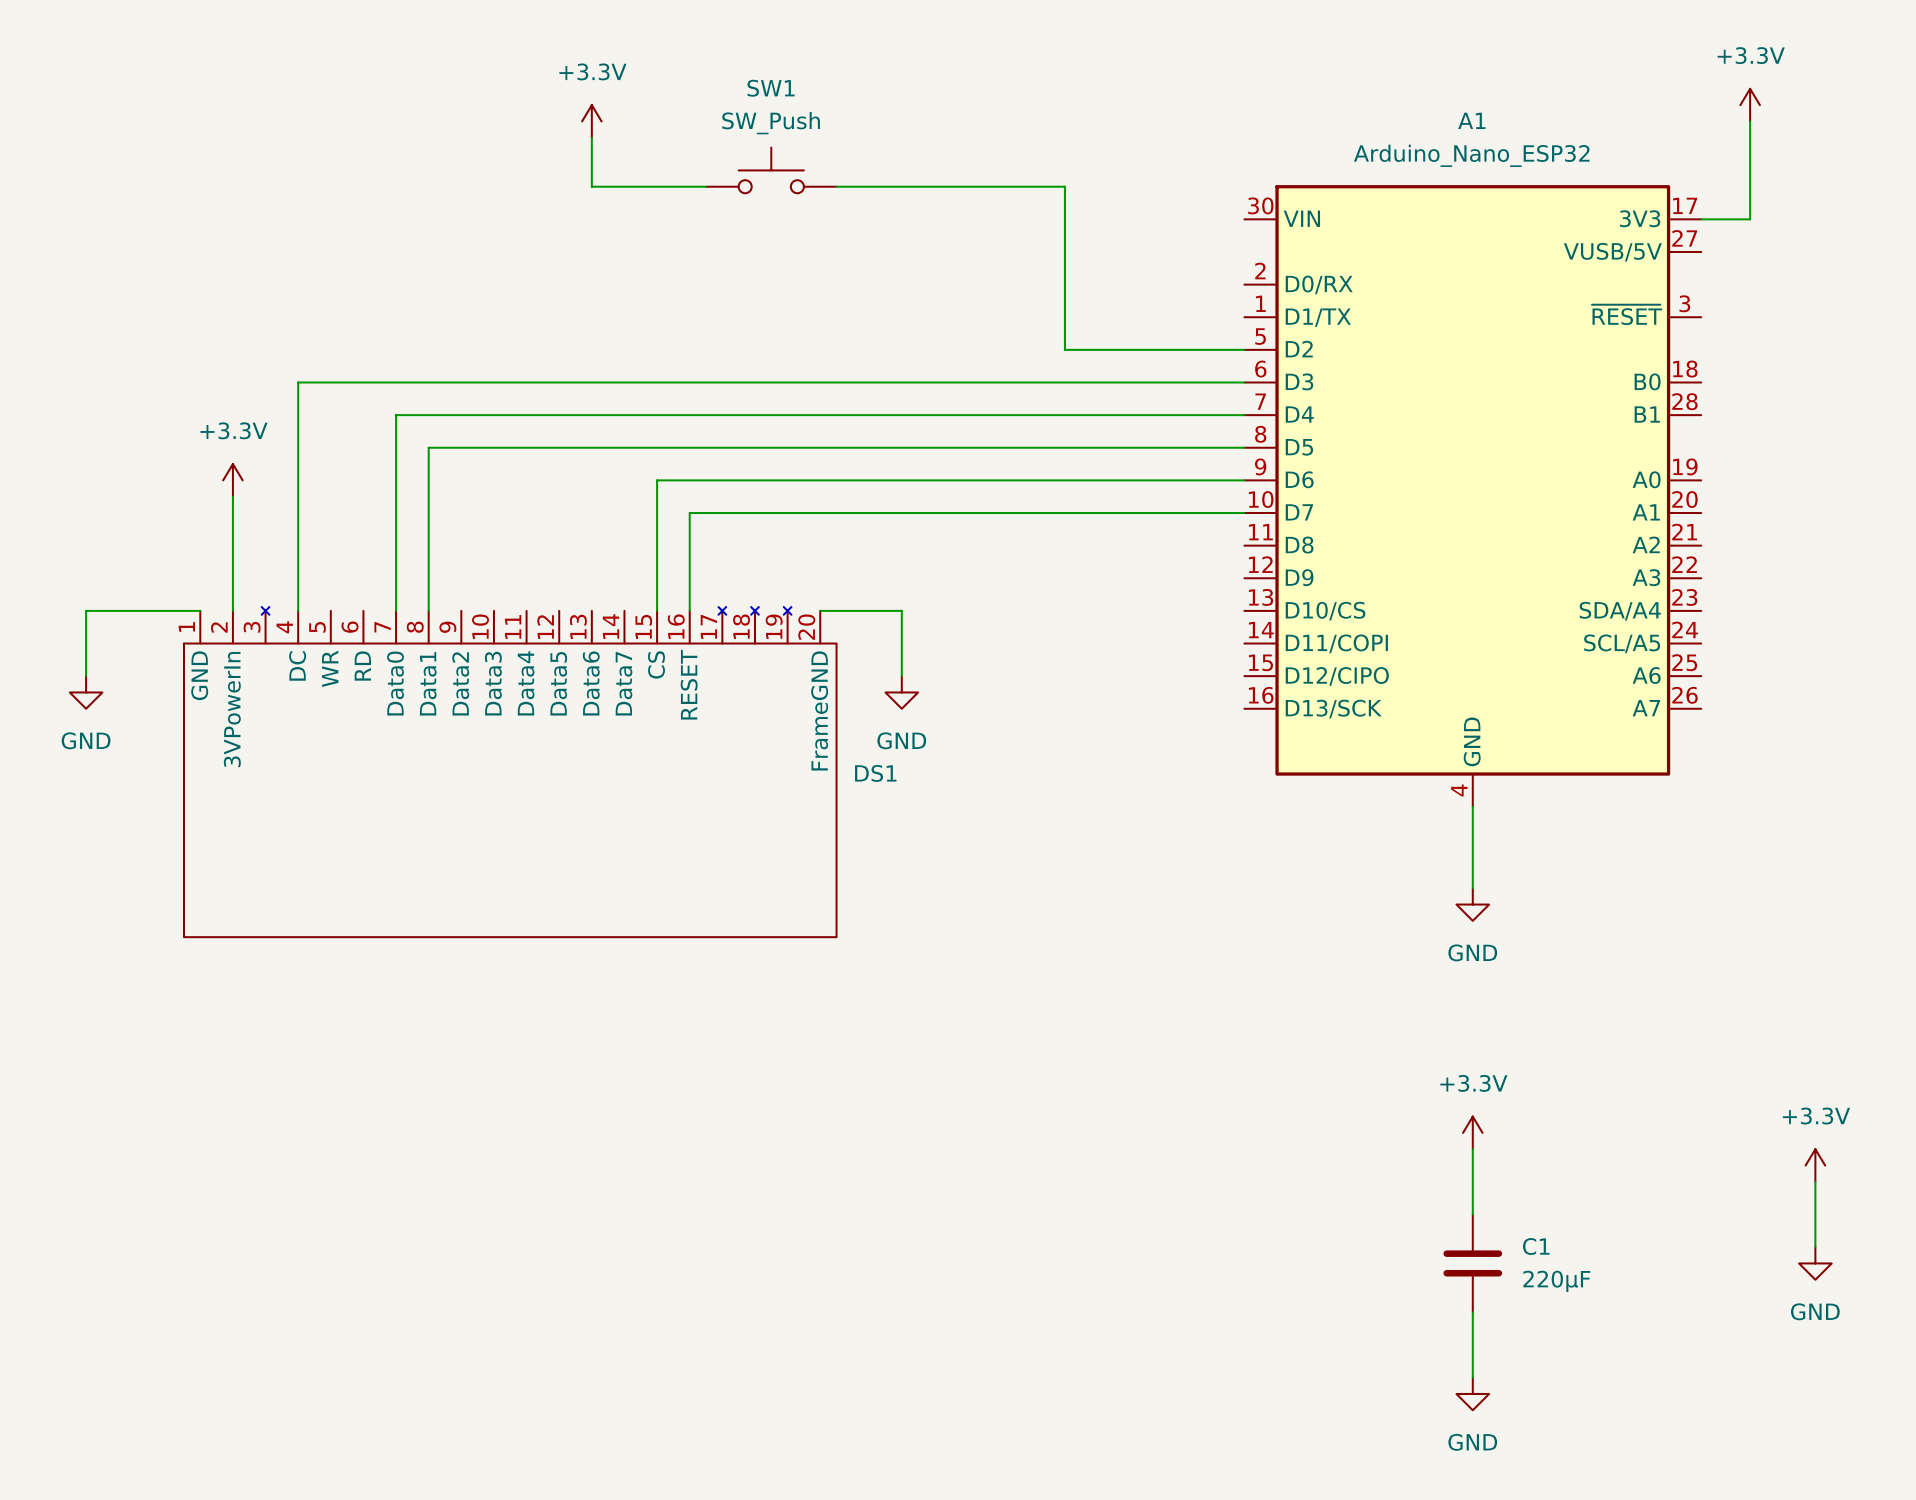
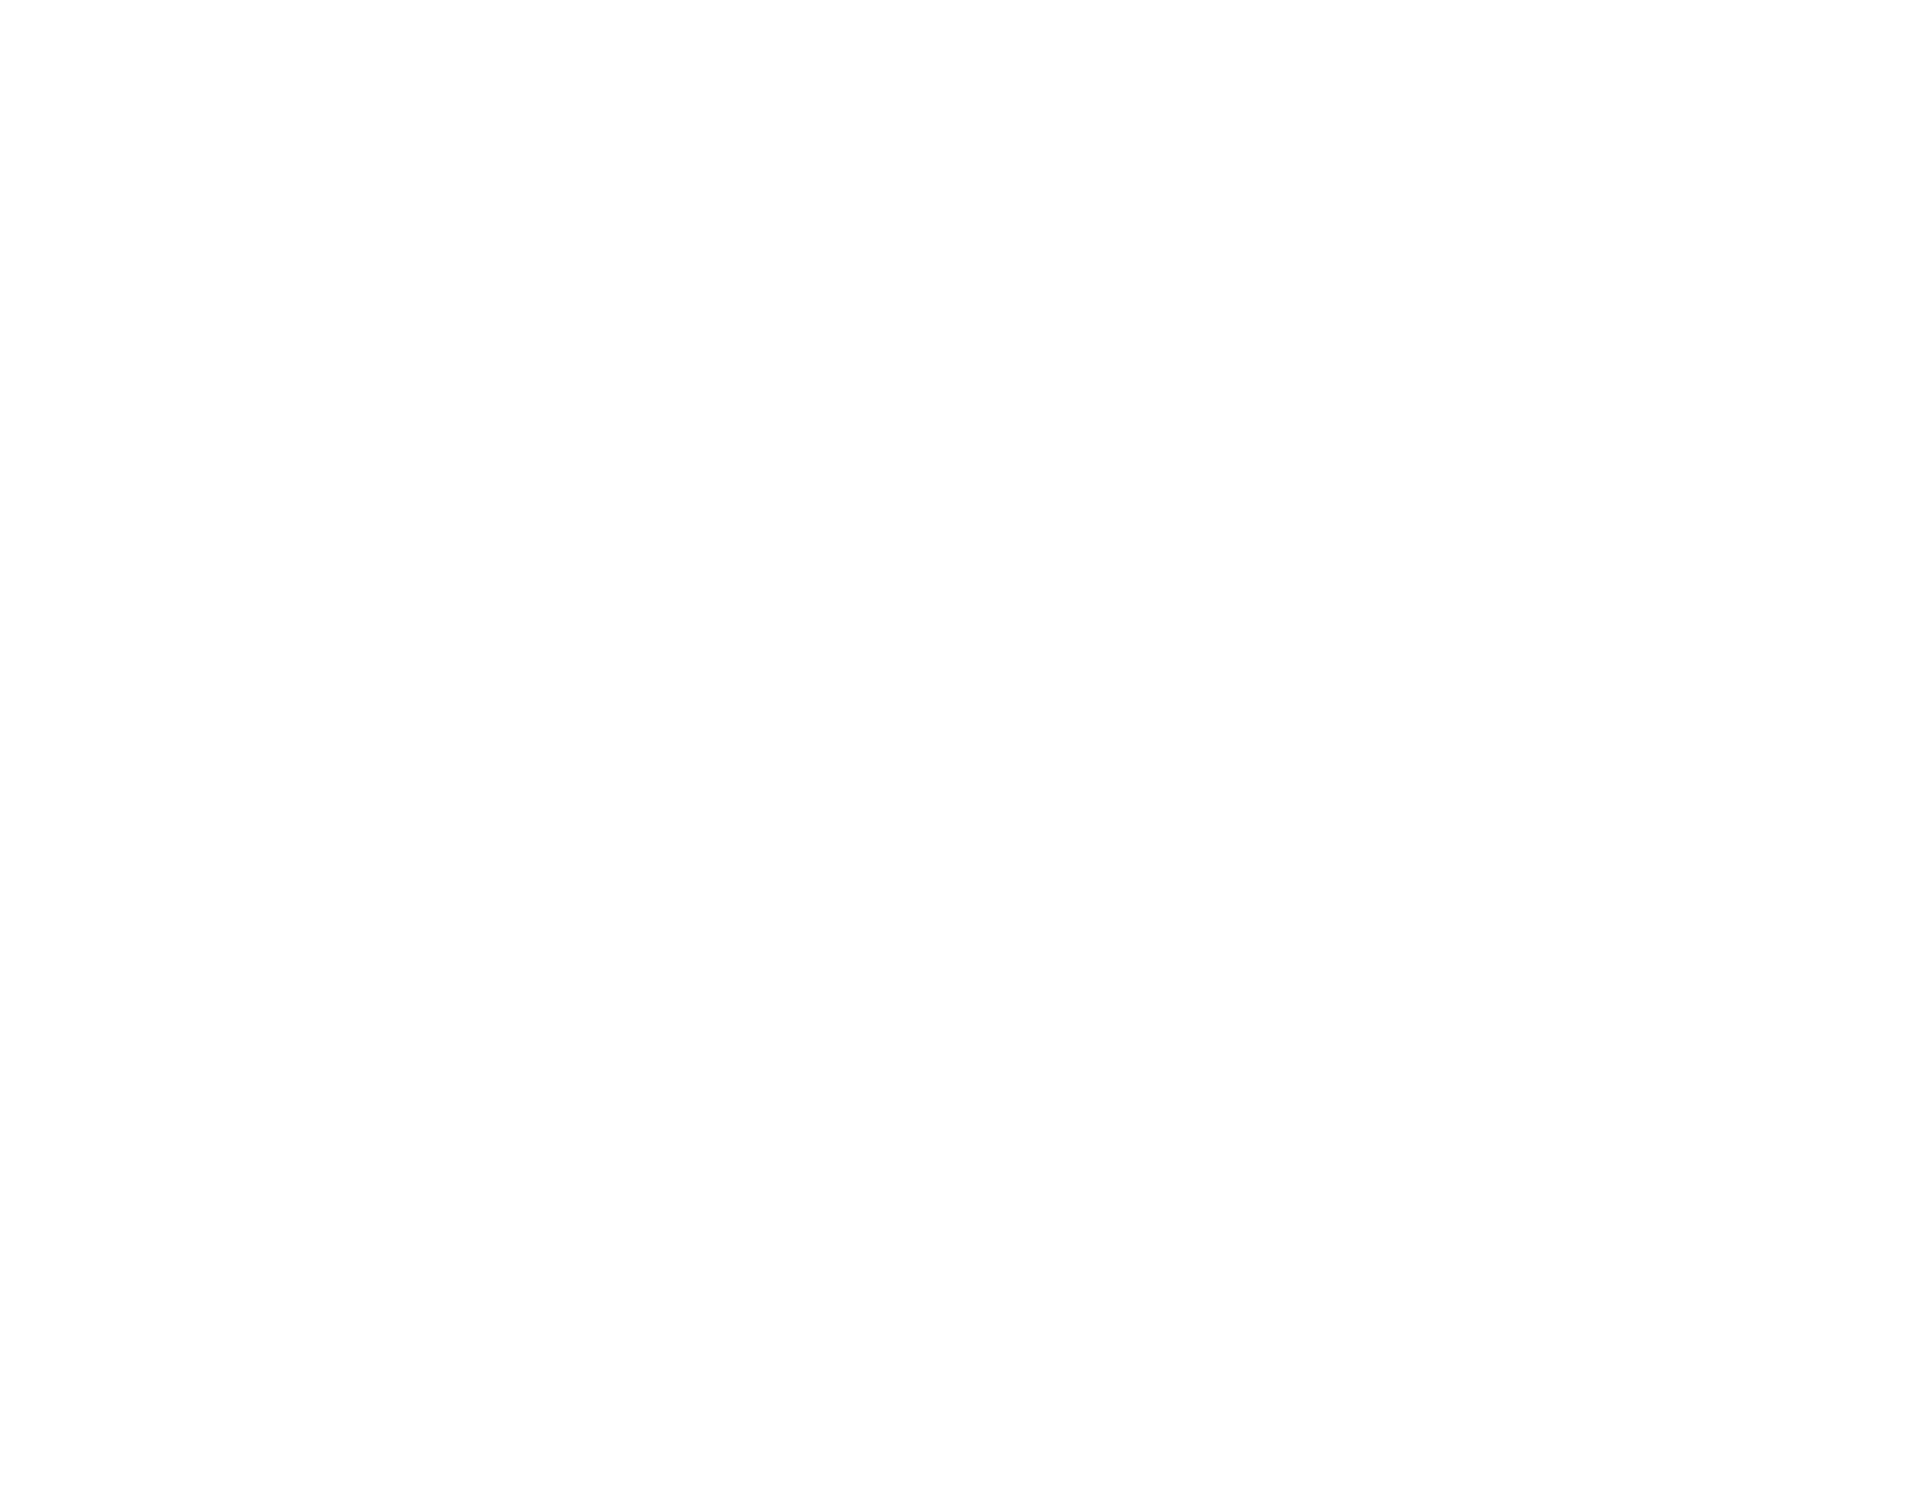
power symbol: +3.3V (1750, 105) -> none
power symbol: +3.3V (591, 121) -> none
wire: (1750, 121) (1750, 219) (1701, 219) -> none
wire: (591, 137) (591, 186) (706, 186) -> none
SW1: SW_Push (771, 170) -> none
wire: (836, 186) (1064, 186) (1064, 349) (1244, 349) -> none
wire: (1244, 382) (298, 382) (298, 610) -> none
wire: (1244, 415) (396, 415) (396, 610) -> none
wire: (1244, 447) (428, 447) (428, 610) -> none
power symbol: +3.3V (232, 480) -> none
wire: (1244, 480) (657, 480) (657, 610) -> none
A1: Arduino_Nano_ESP32 (1472, 495) -> none
wire: (232, 496) (232, 610) -> none
wire: (1244, 513) (689, 513) (689, 610) -> none
wire: (200, 610) (86, 610) (86, 676) -> none
wire: (820, 610) (901, 610) (901, 676) -> none
power symbol: GND (86, 692) -> none
power symbol: GND (901, 692) -> none
DS1: (510, 772) -> none
wire: (1472, 806) (1472, 888) -> none
power symbol: GND (1472, 904) -> none
power symbol: +3.3V (1472, 1132) -> none
wire: (1472, 1149) (1472, 1214) -> none
power symbol: +3.3V (1815, 1165) -> none
wire: (1815, 1181) (1815, 1247) -> none
C1: 220μF (1472, 1263) -> none
power symbol: GND (1815, 1263) -> none
wire: (1472, 1312) (1472, 1377) -> none
power symbol: GND (1472, 1393) -> none

